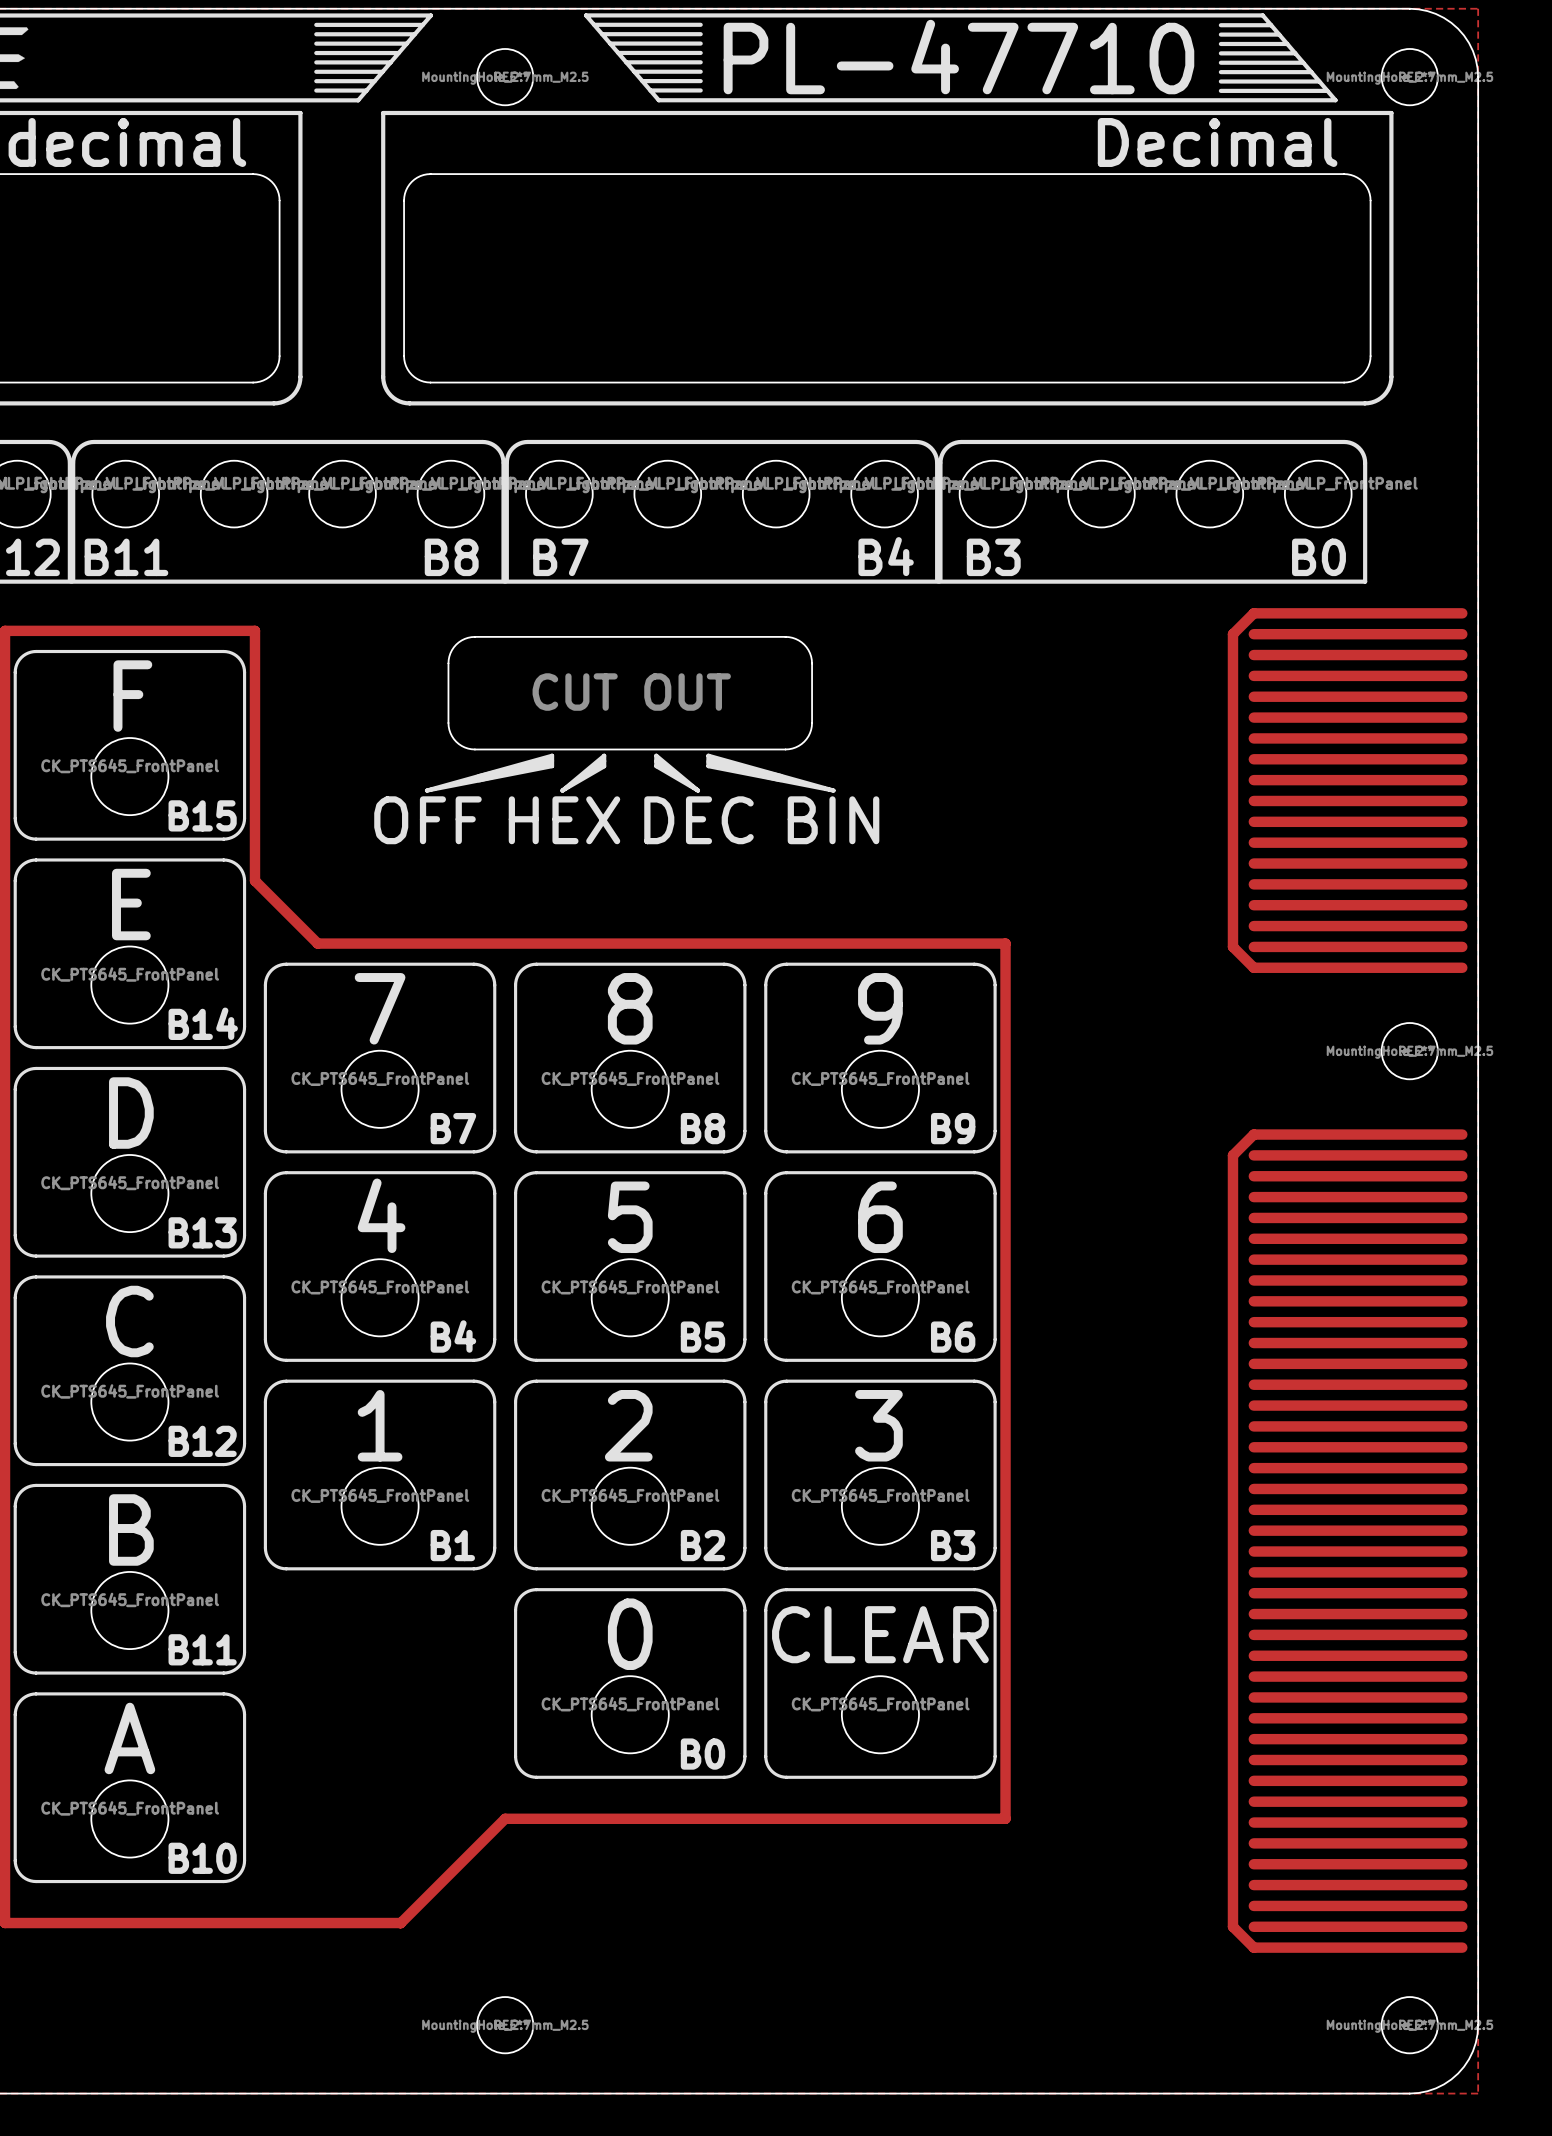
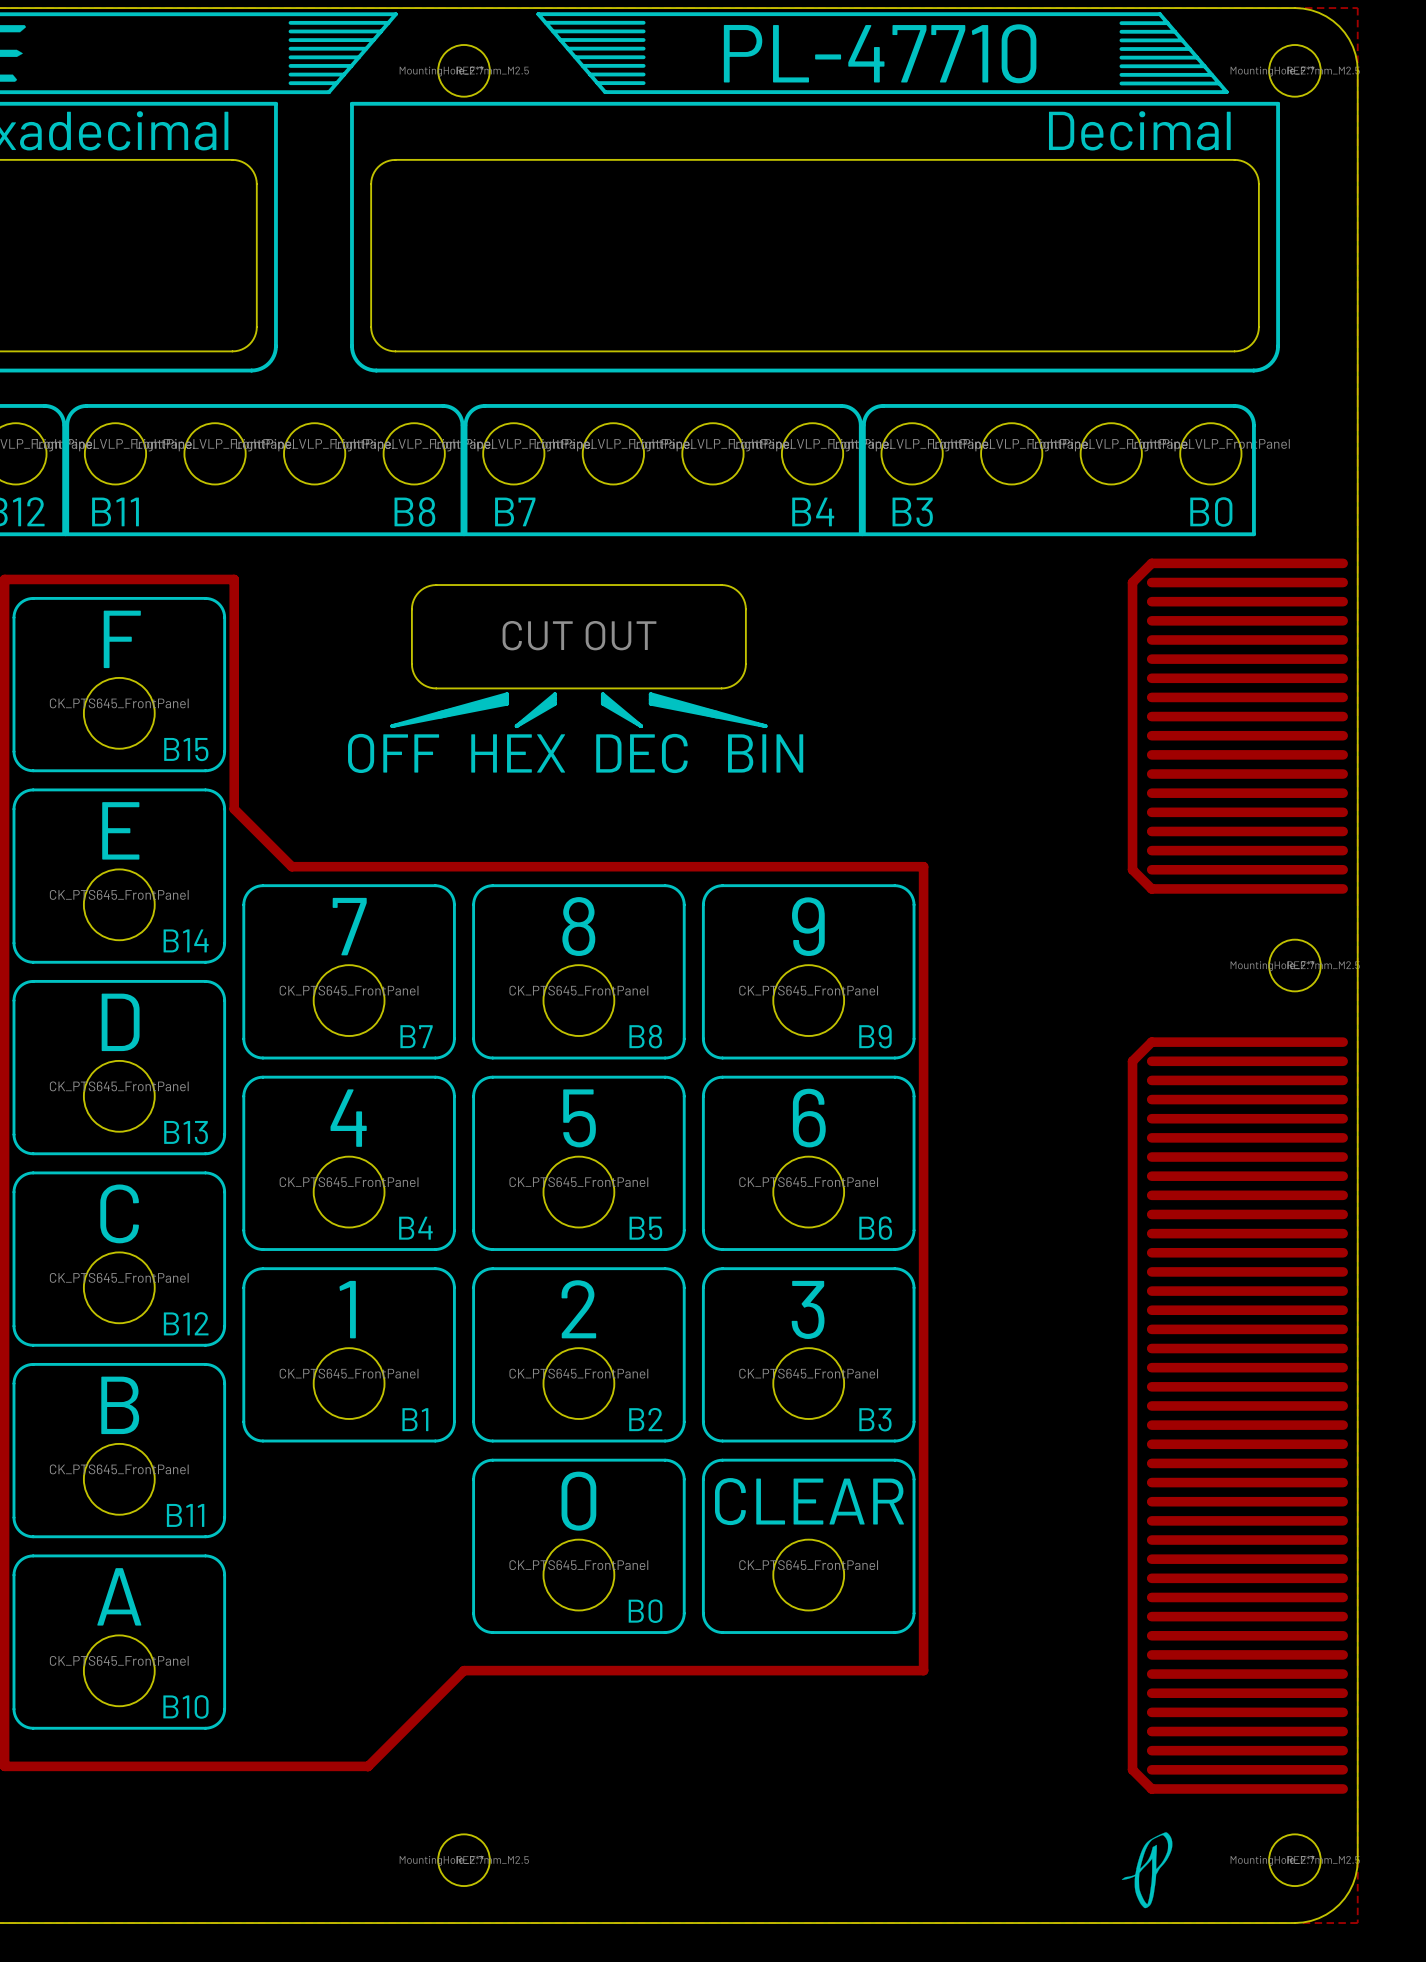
drawing: none -> [1121, 1832, 1173, 1909]

